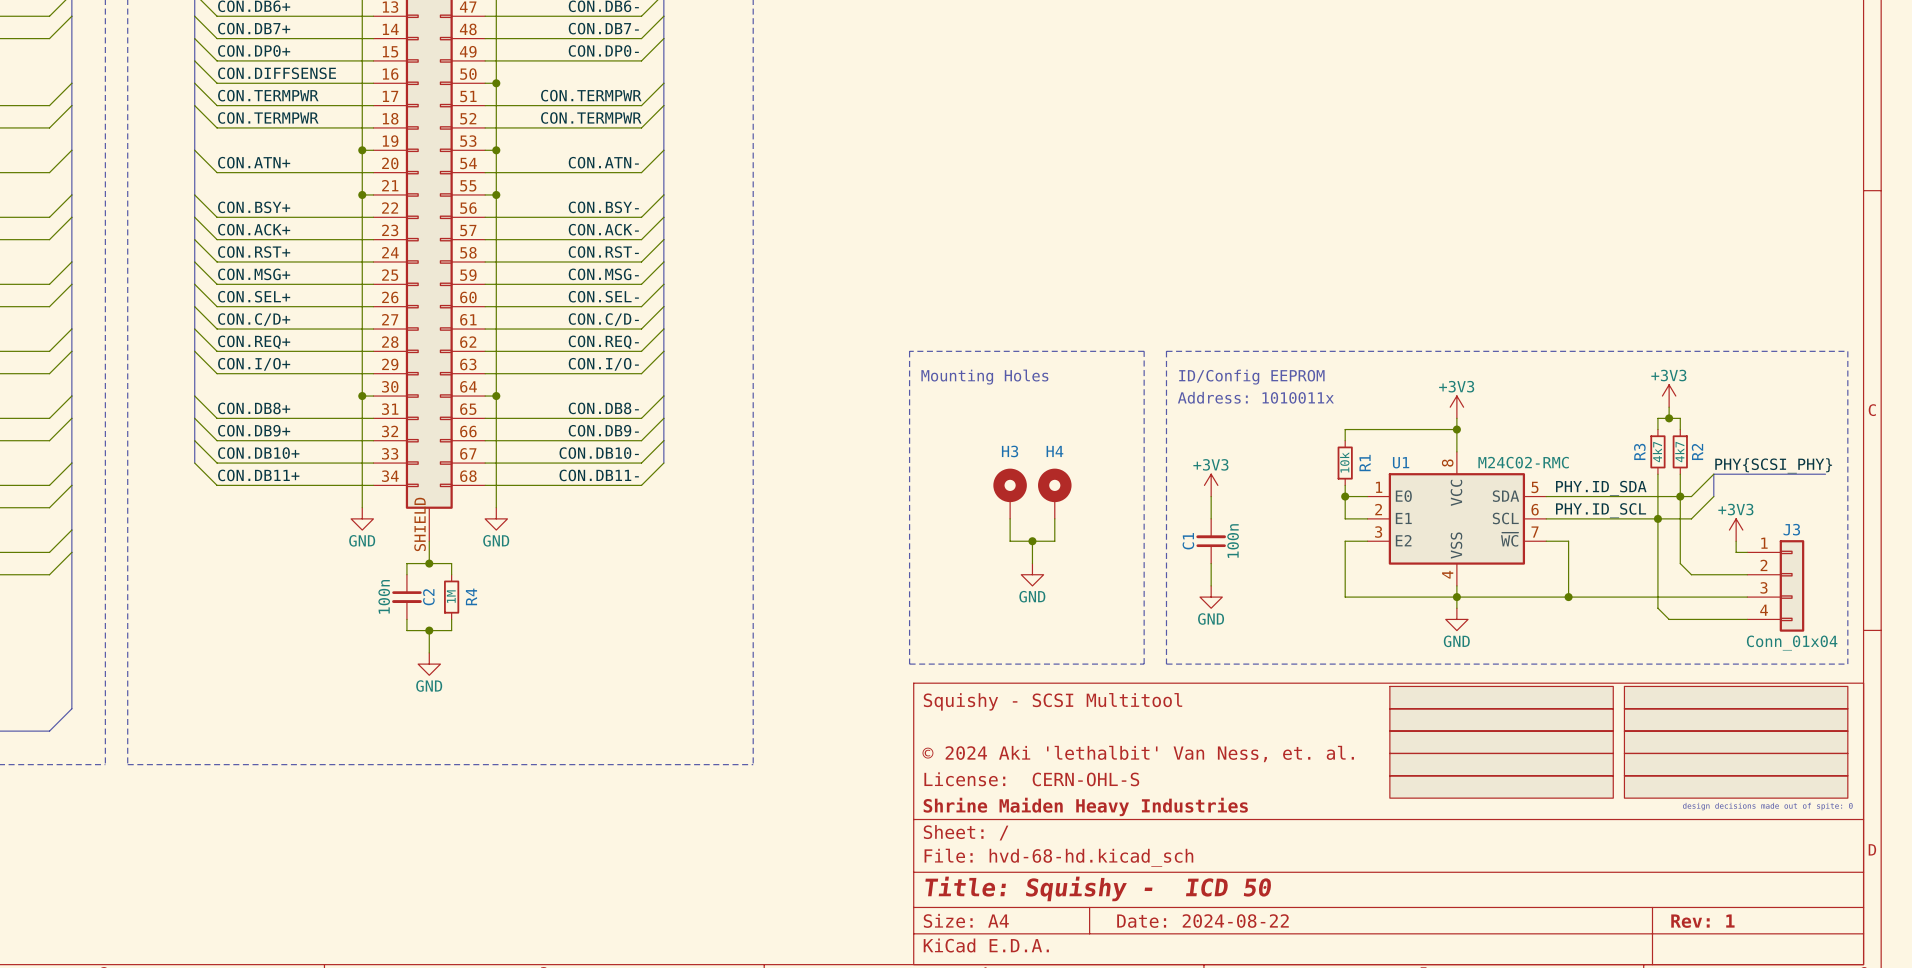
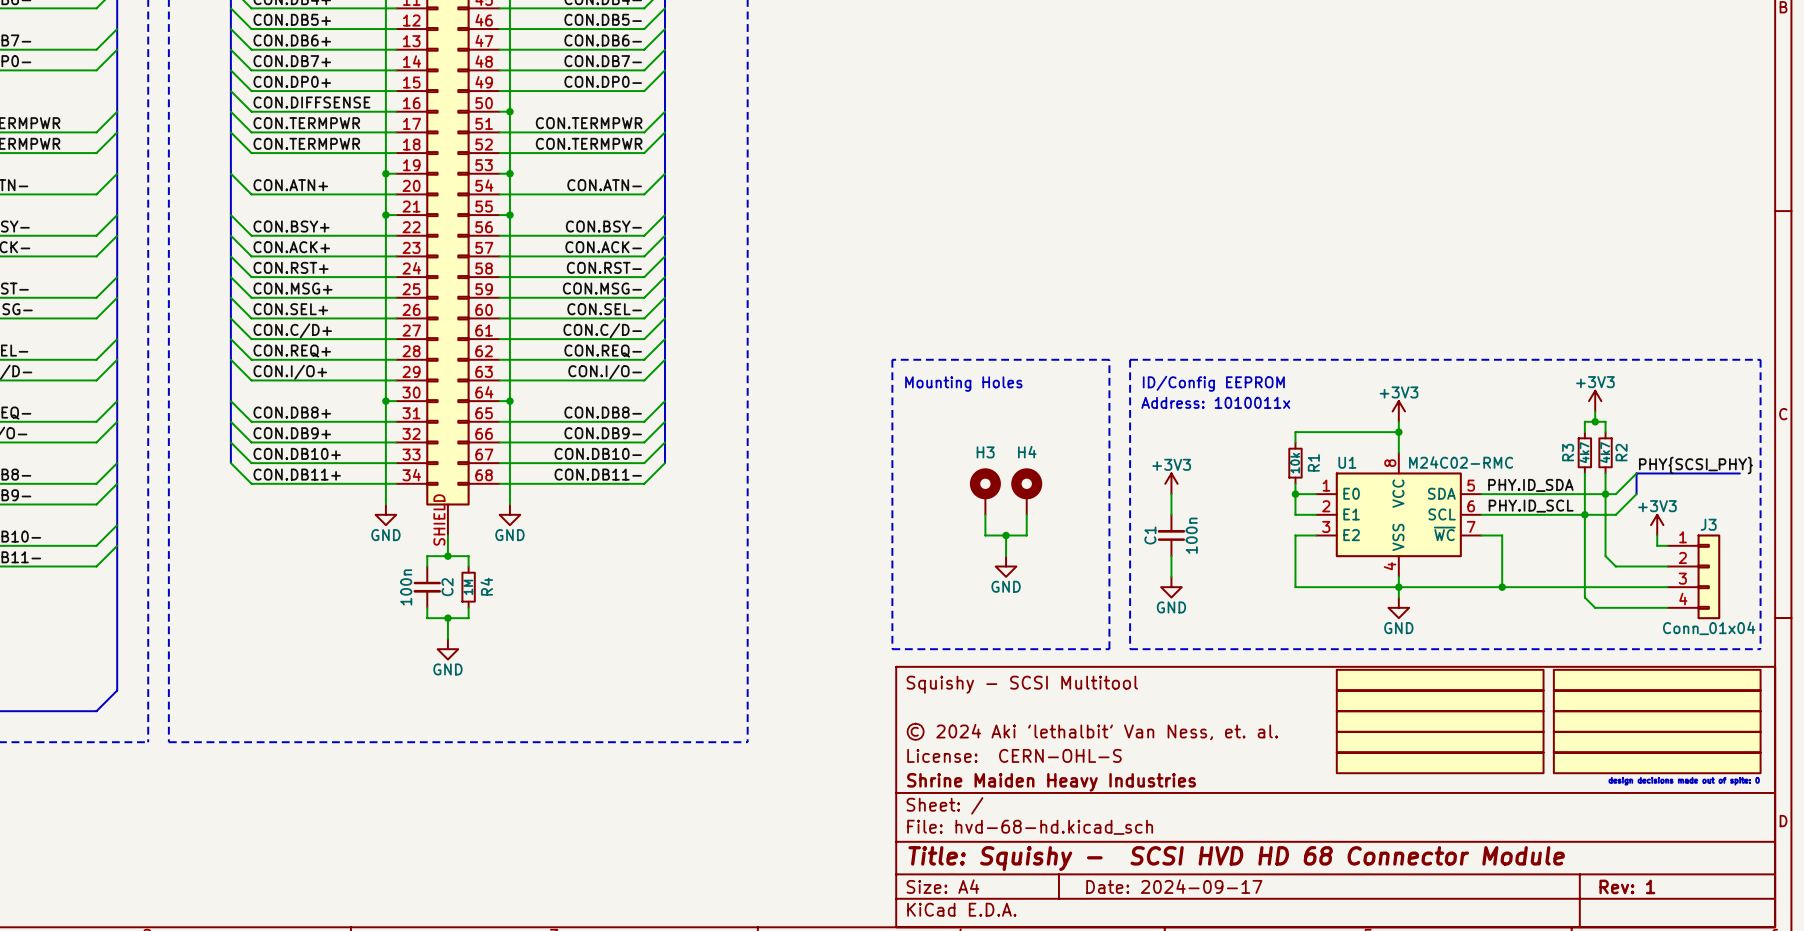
title block: Title: Squishy - ICD 50 (1098, 888) -> Title: Squishy - SCSI HVD HD 68 Connector Module (1236, 858)
title block: Date: 2024-08-22 (1202, 921) -> Date: 2024-09-17 (1174, 886)

